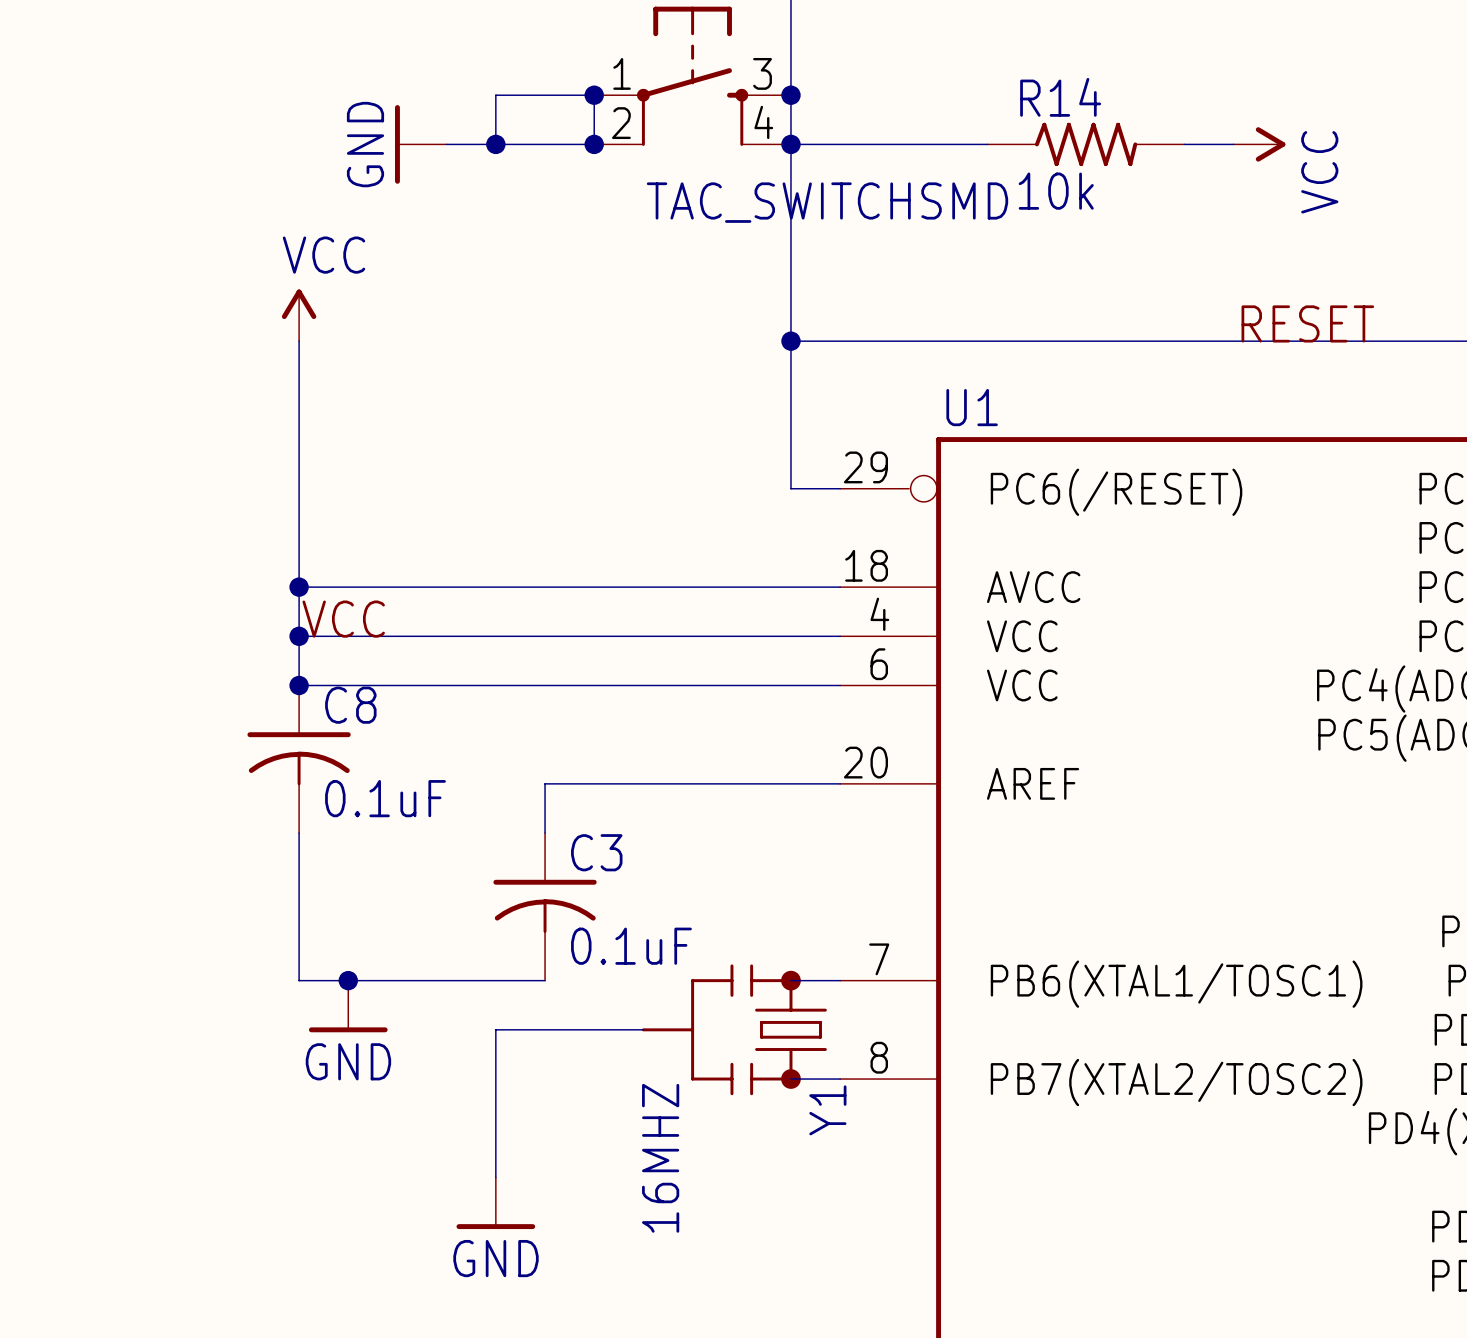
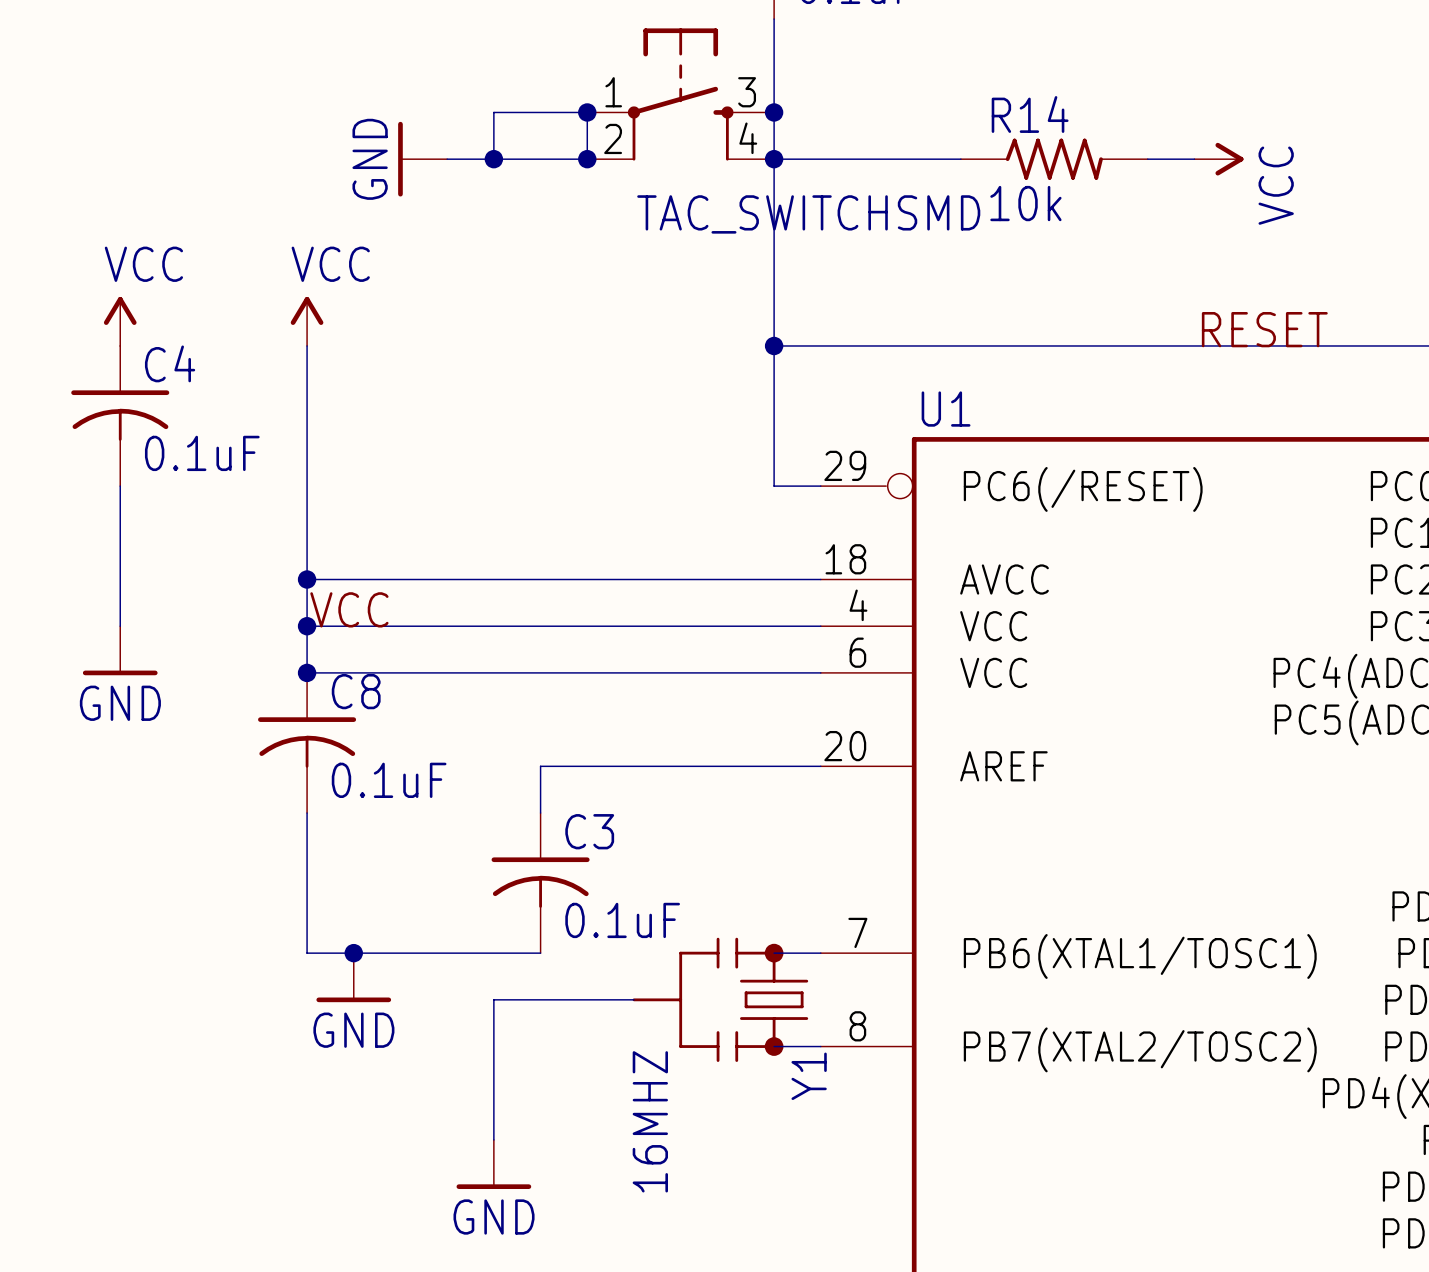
power symbol: none -> VCC (120, 321)
C4: none -> 0.1uF (120, 416)
wire: none -> (120, 486) (120, 626)
power symbol: none -> GND (120, 650)

